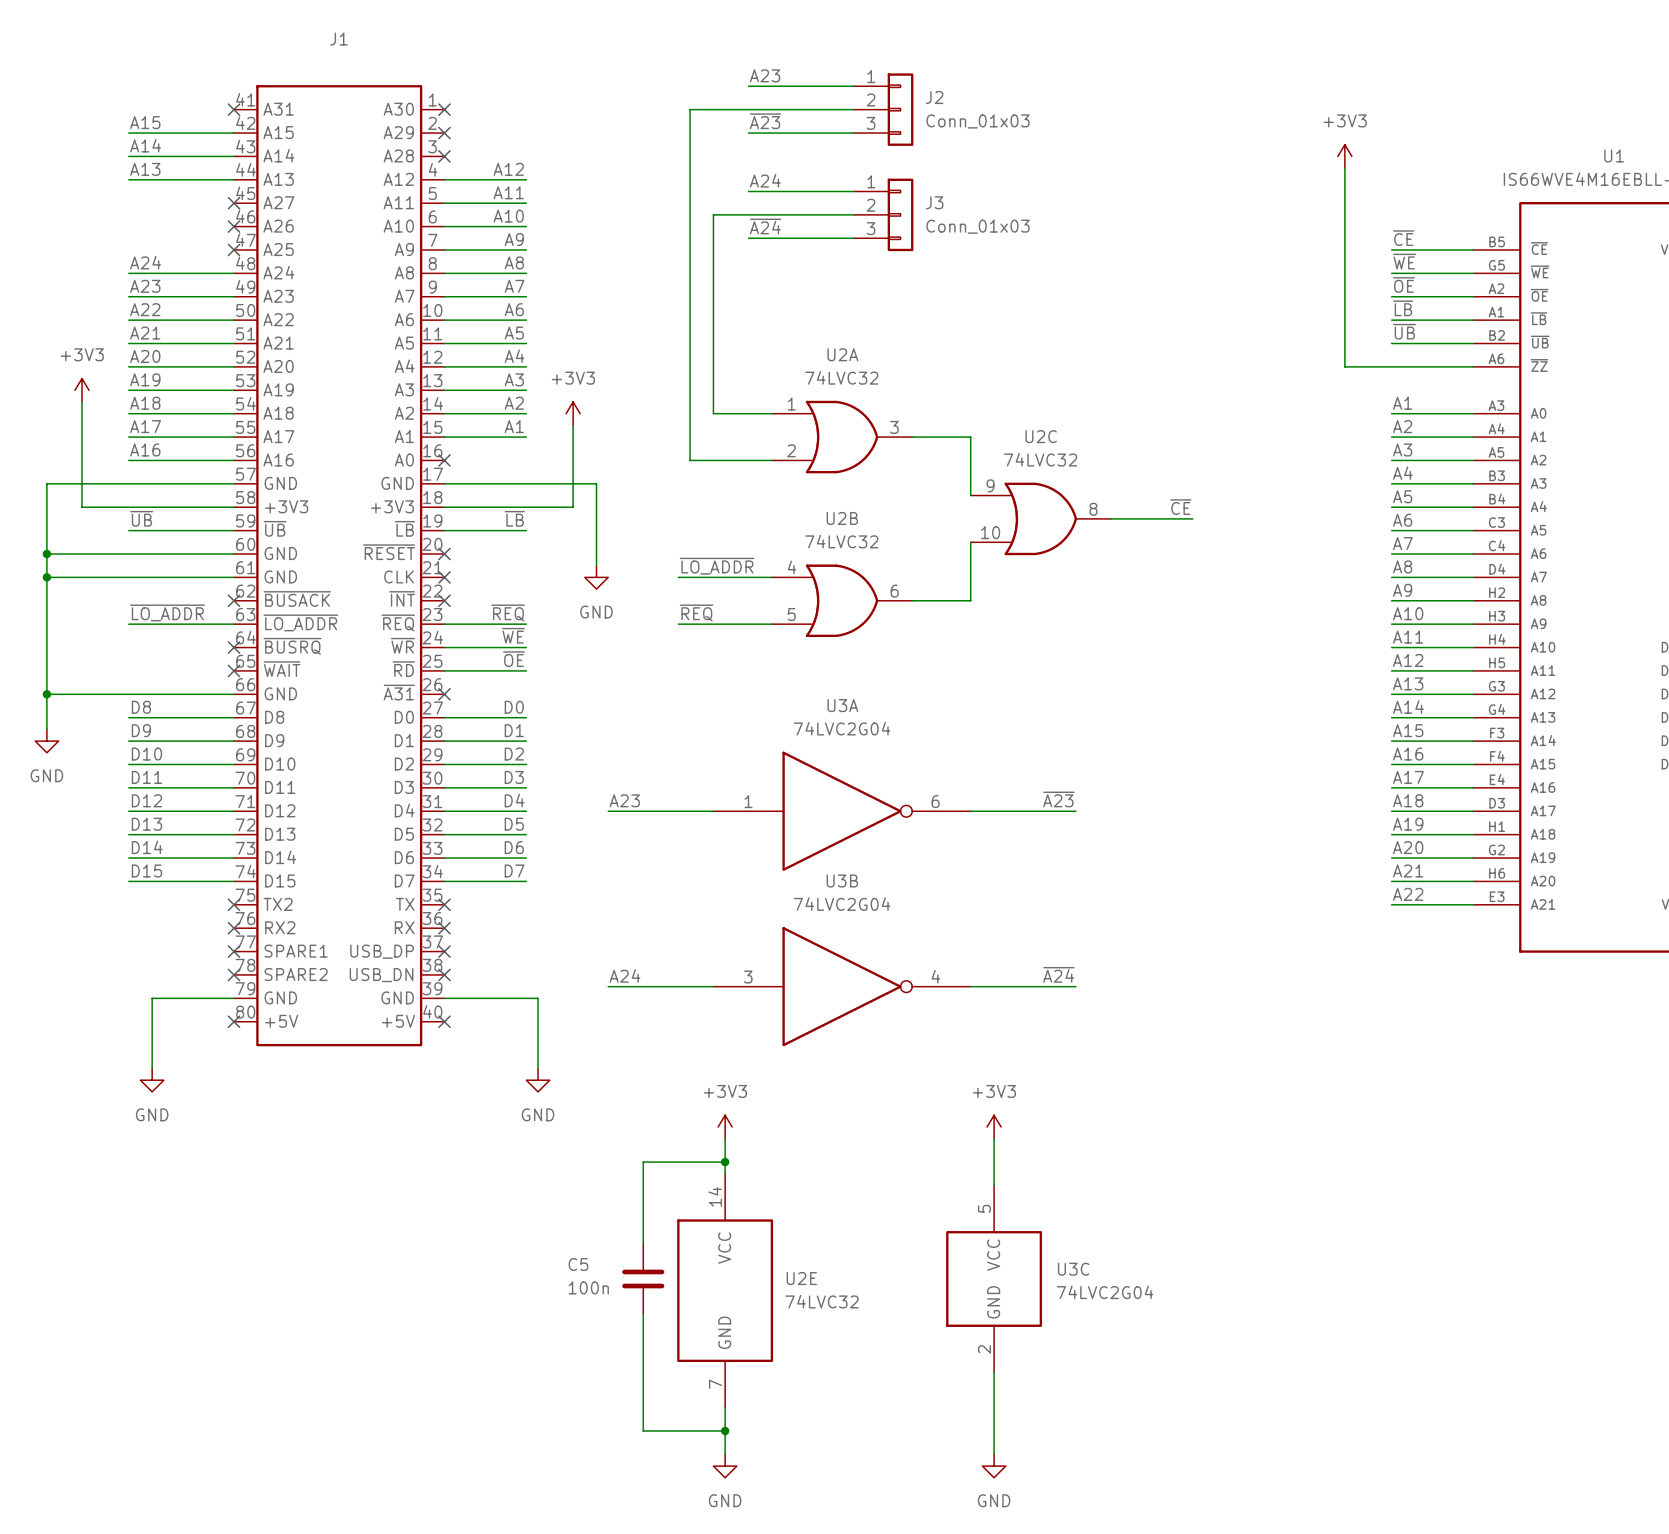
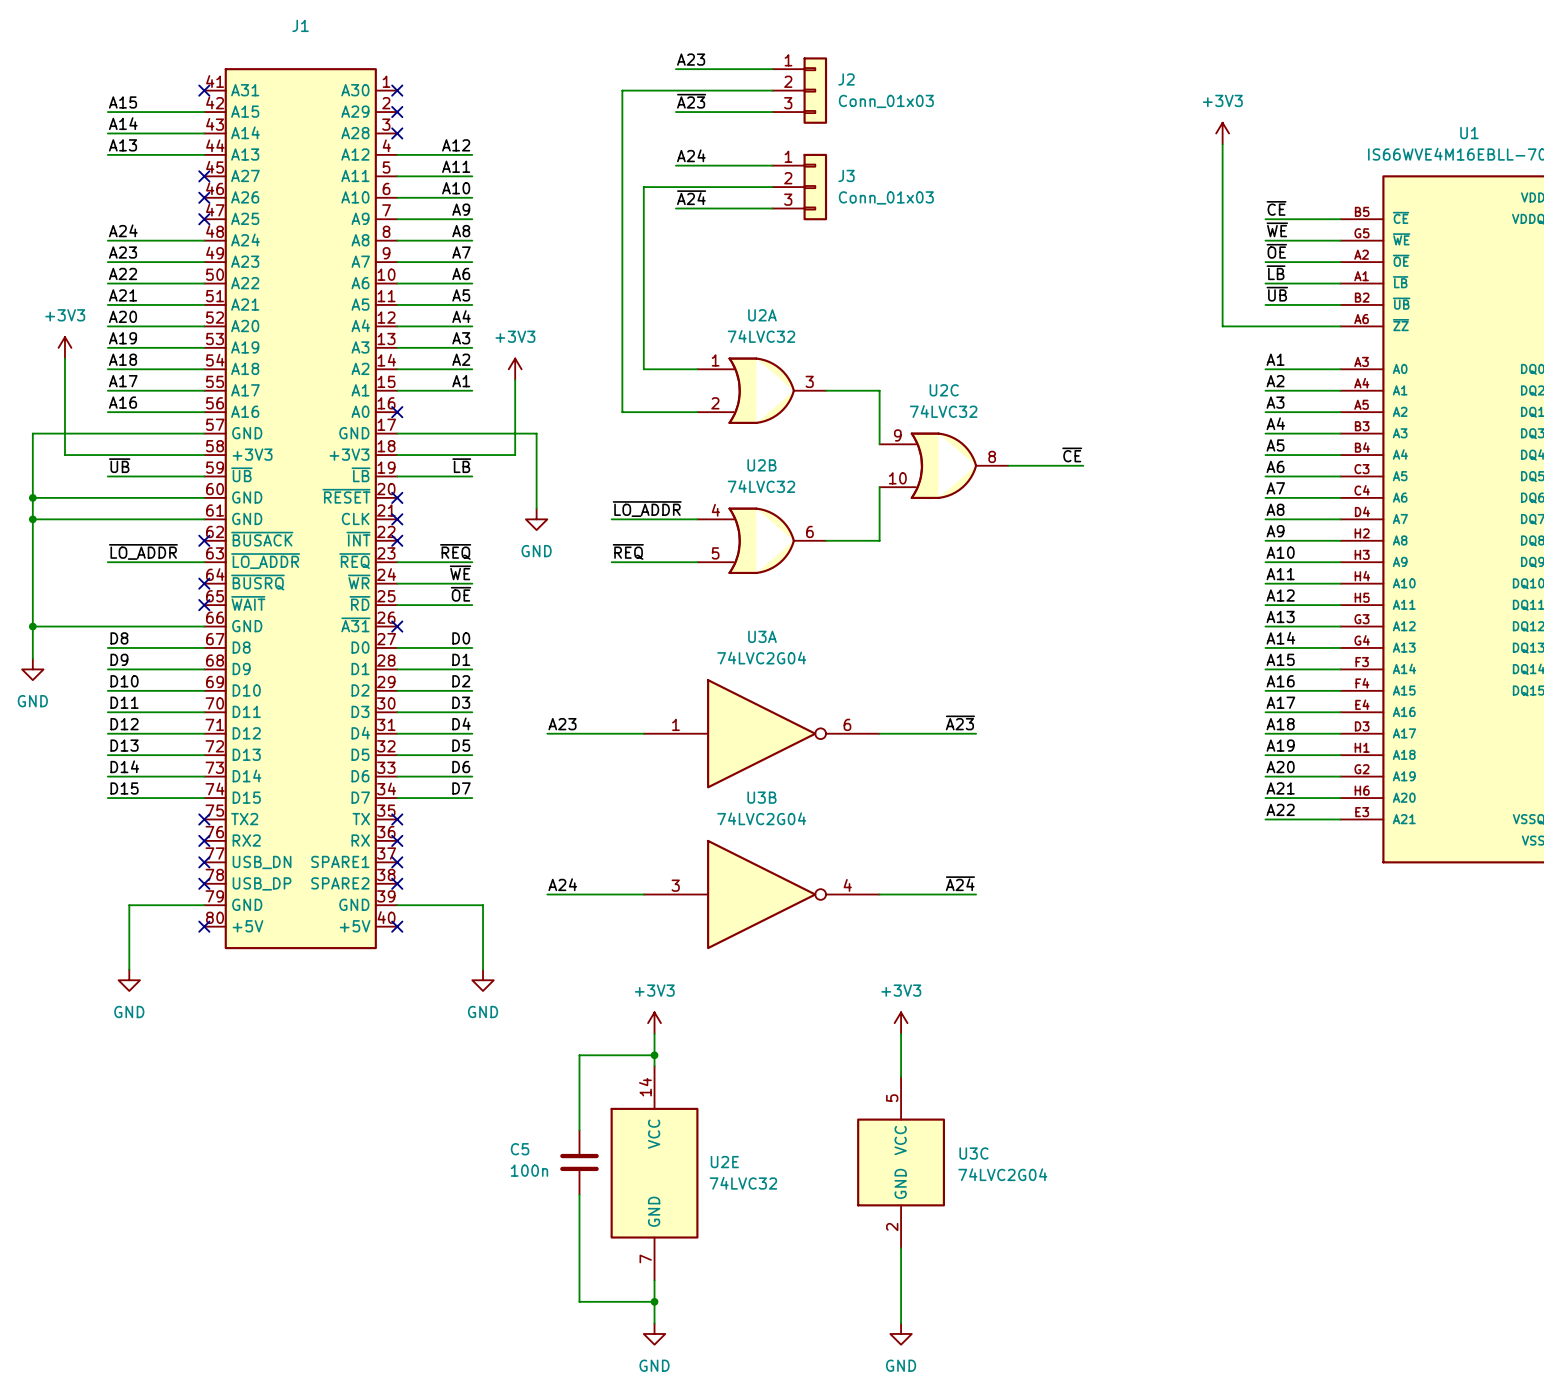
J1 pin name: SPARE1 (296, 951) -> USB_DN (262, 862)
J1 pin name: USB_DP (382, 951) -> SPARE1 (340, 861)
J1 pin name: SPARE2 (296, 974) -> USB_DP (262, 883)
J1 pin name: USB_DN (381, 975) -> SPARE2 (340, 883)

